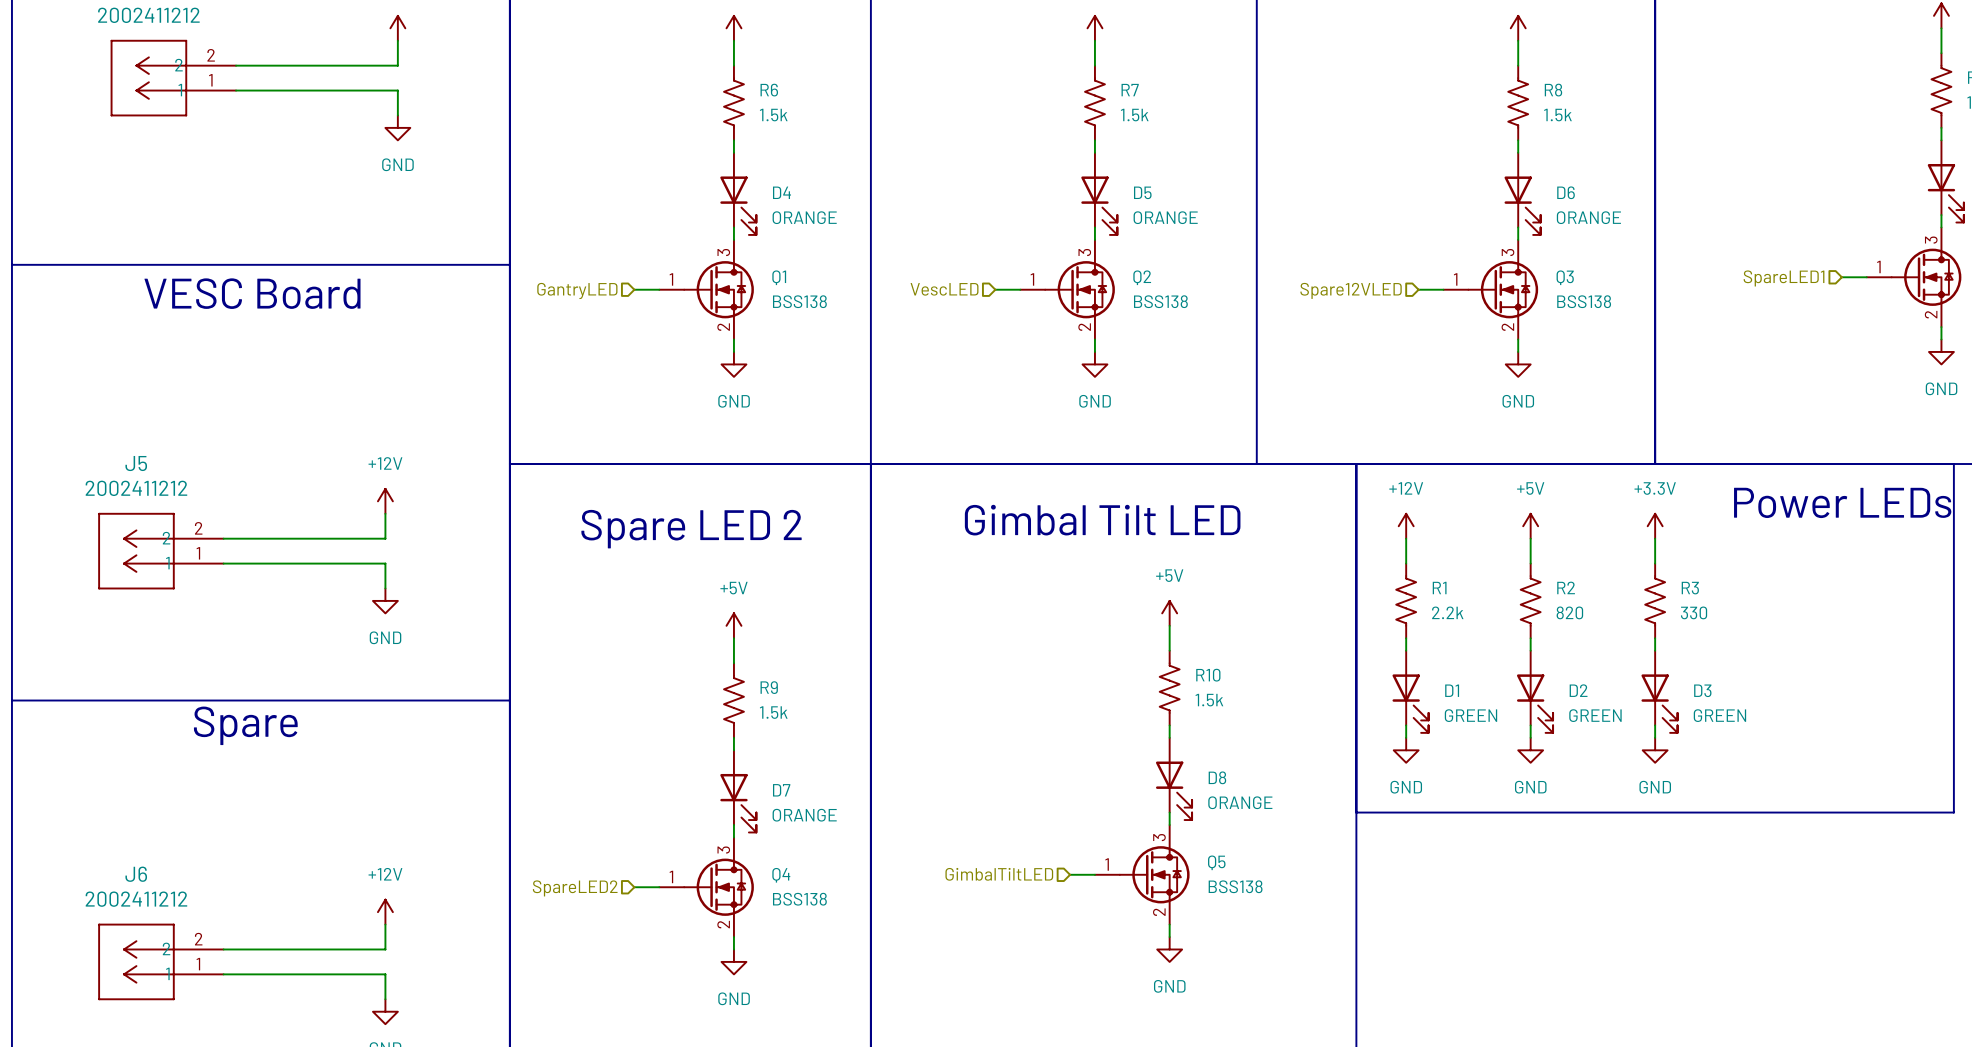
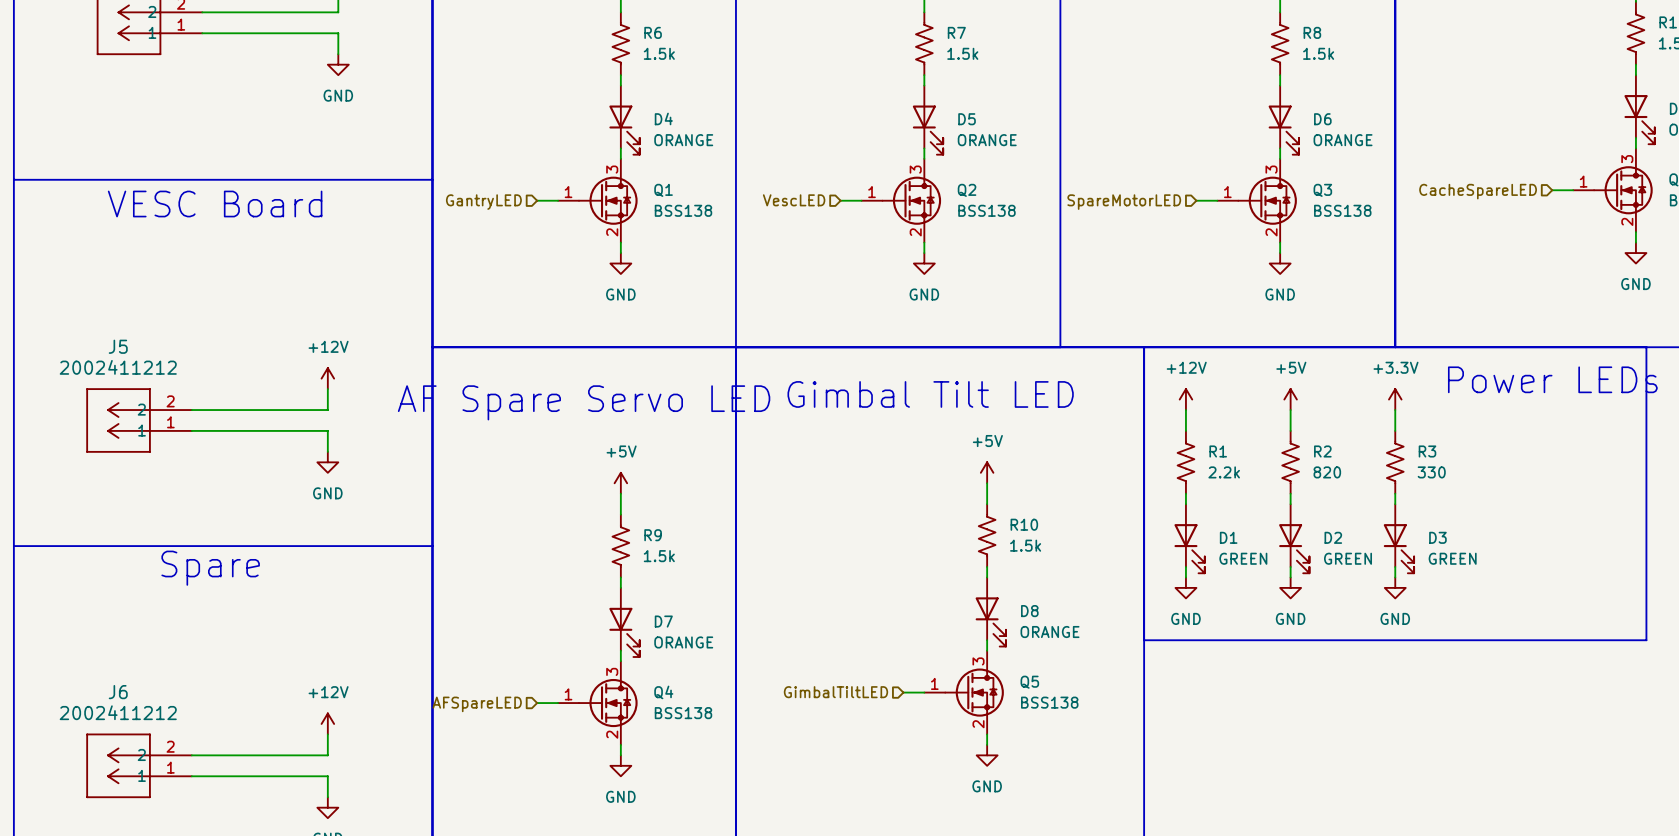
hierarchical label: SpareLED1 (1784, 278) -> CacheSpareLED (1478, 191)
hierarchical label: Spare12VLED (1351, 290) -> SpareMotorLED (1124, 202)
text: Spare LED 2 (691, 529) -> AF Spare Servo LED (584, 402)
hierarchical label: SpareLED2 (575, 888) -> AFSpareLED (477, 704)

